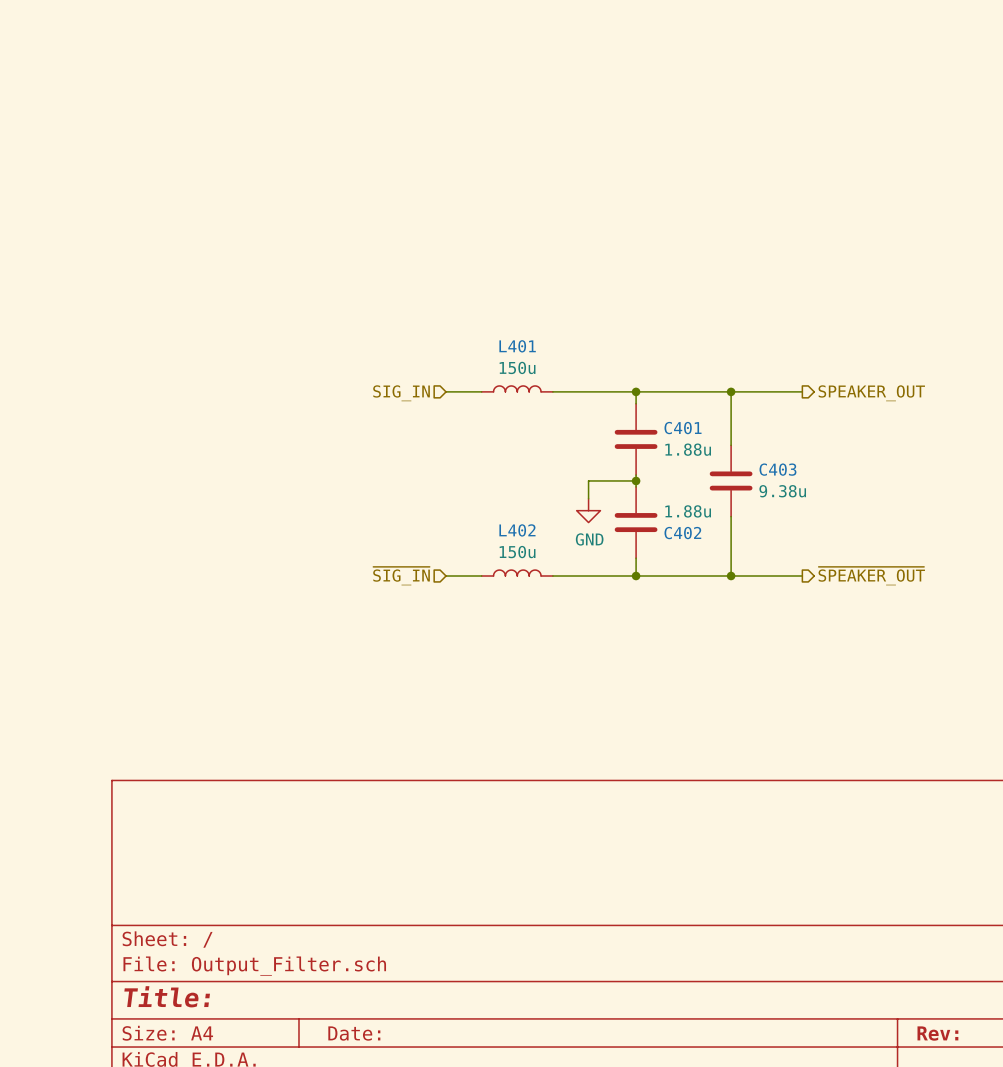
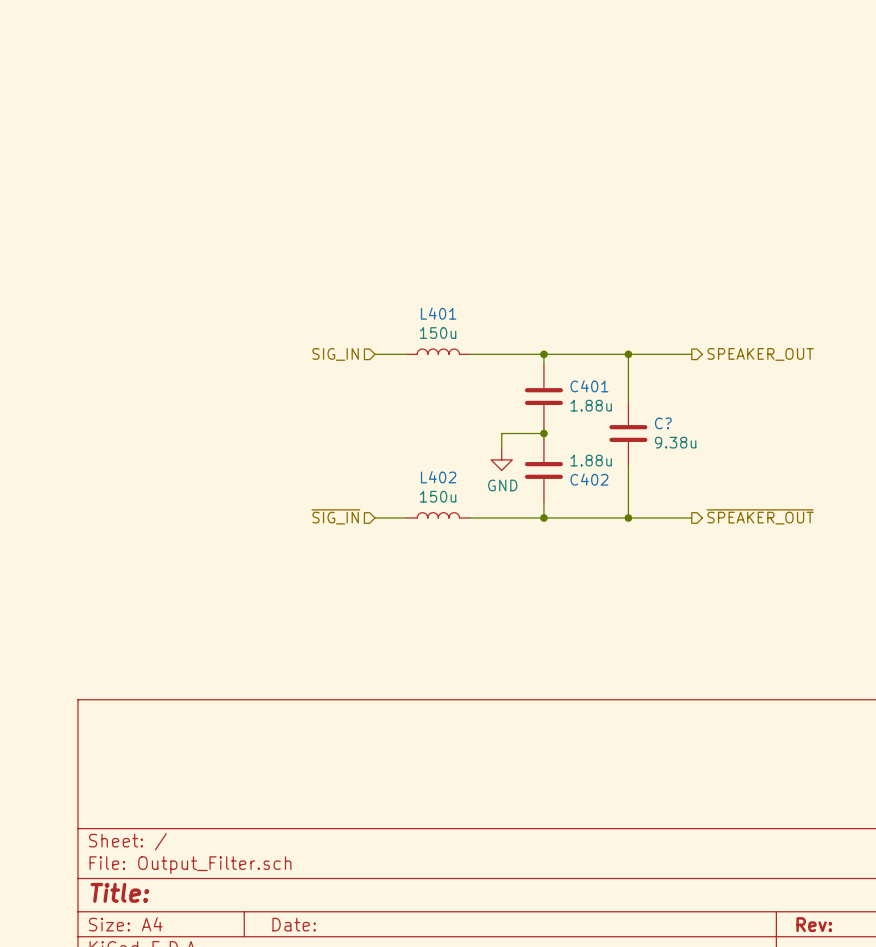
C403 name: C403 (777, 469) -> C? (663, 423)

